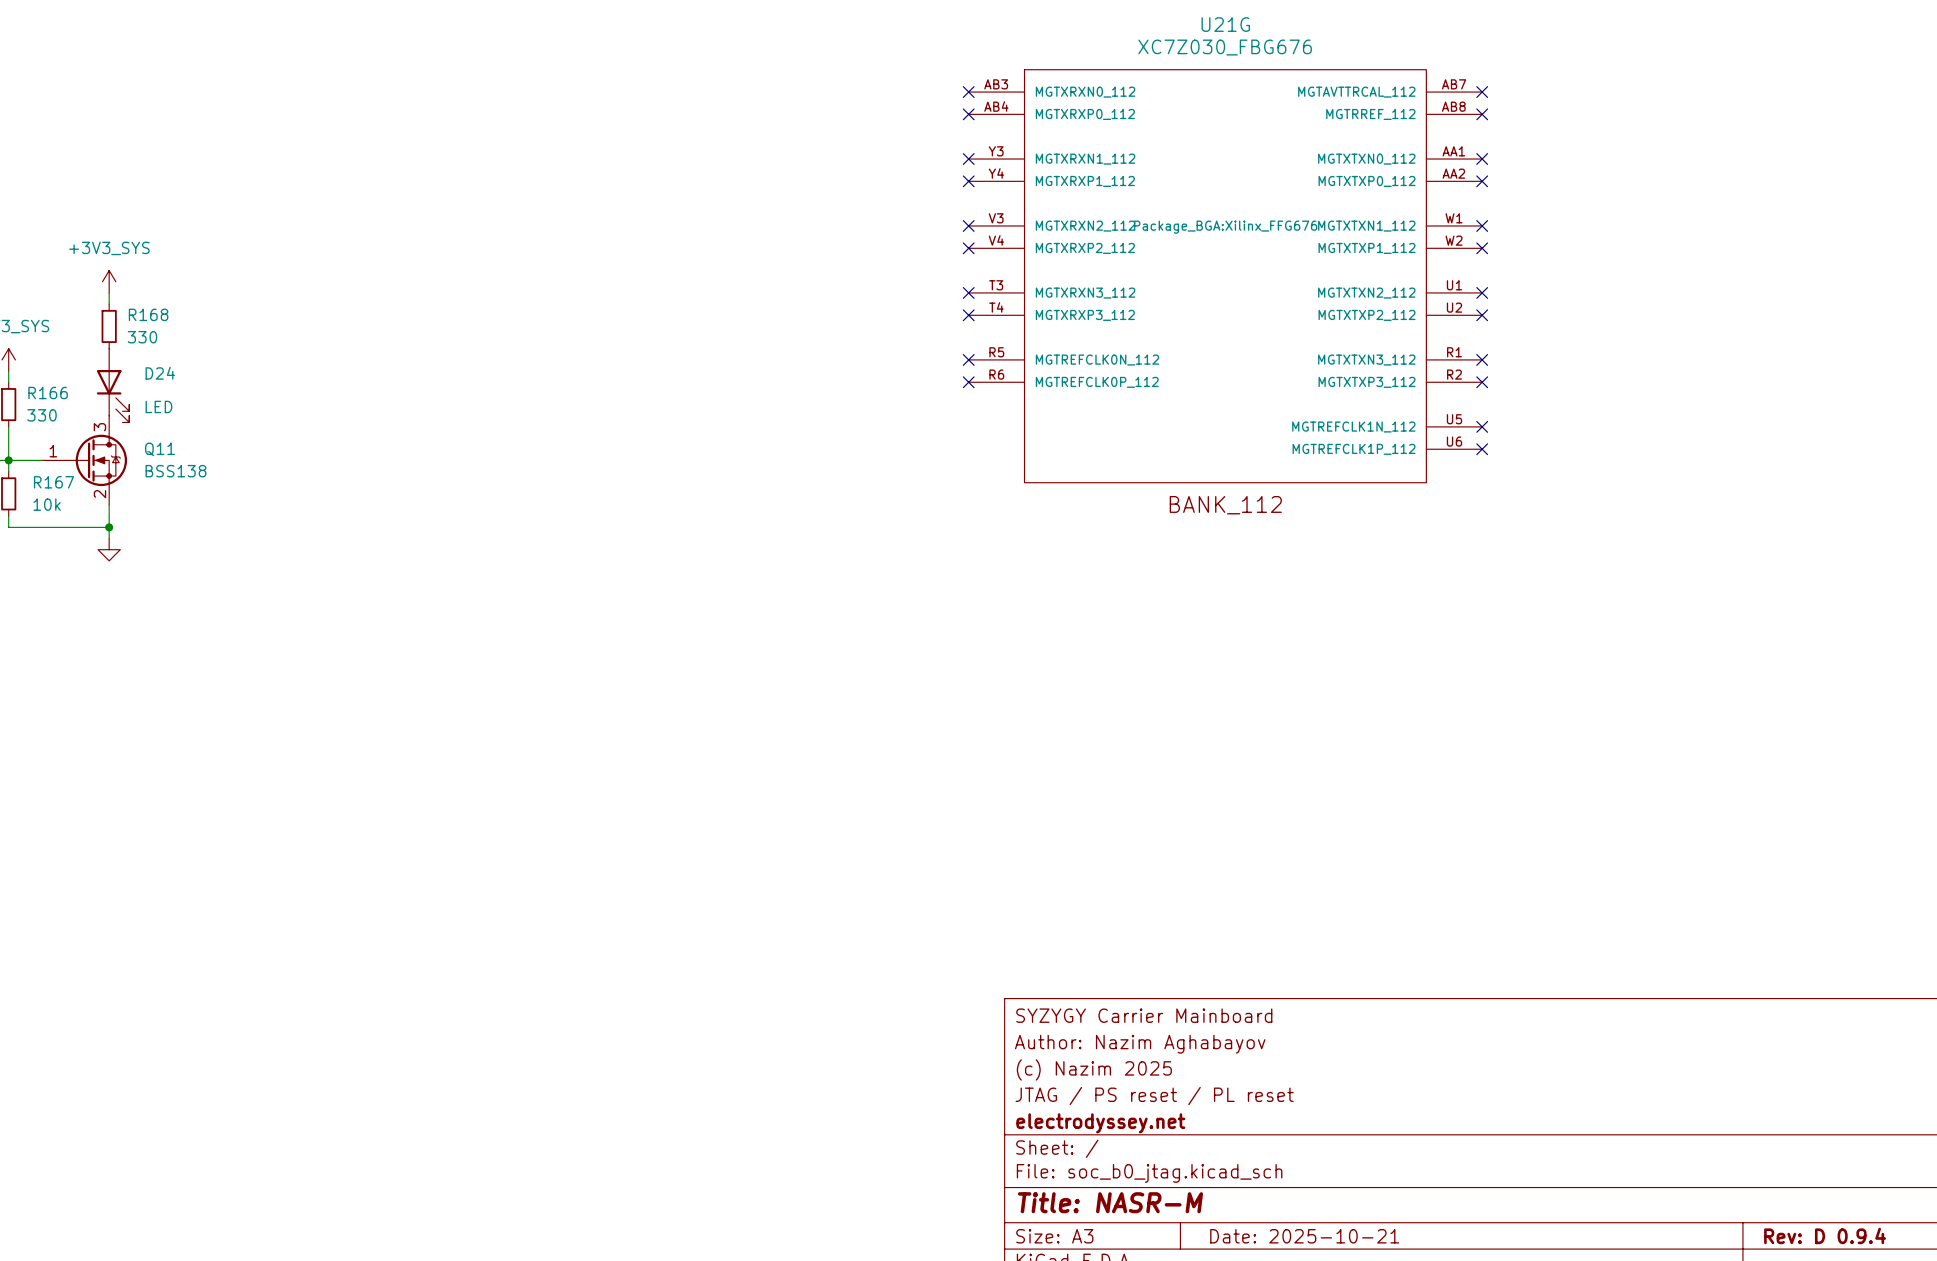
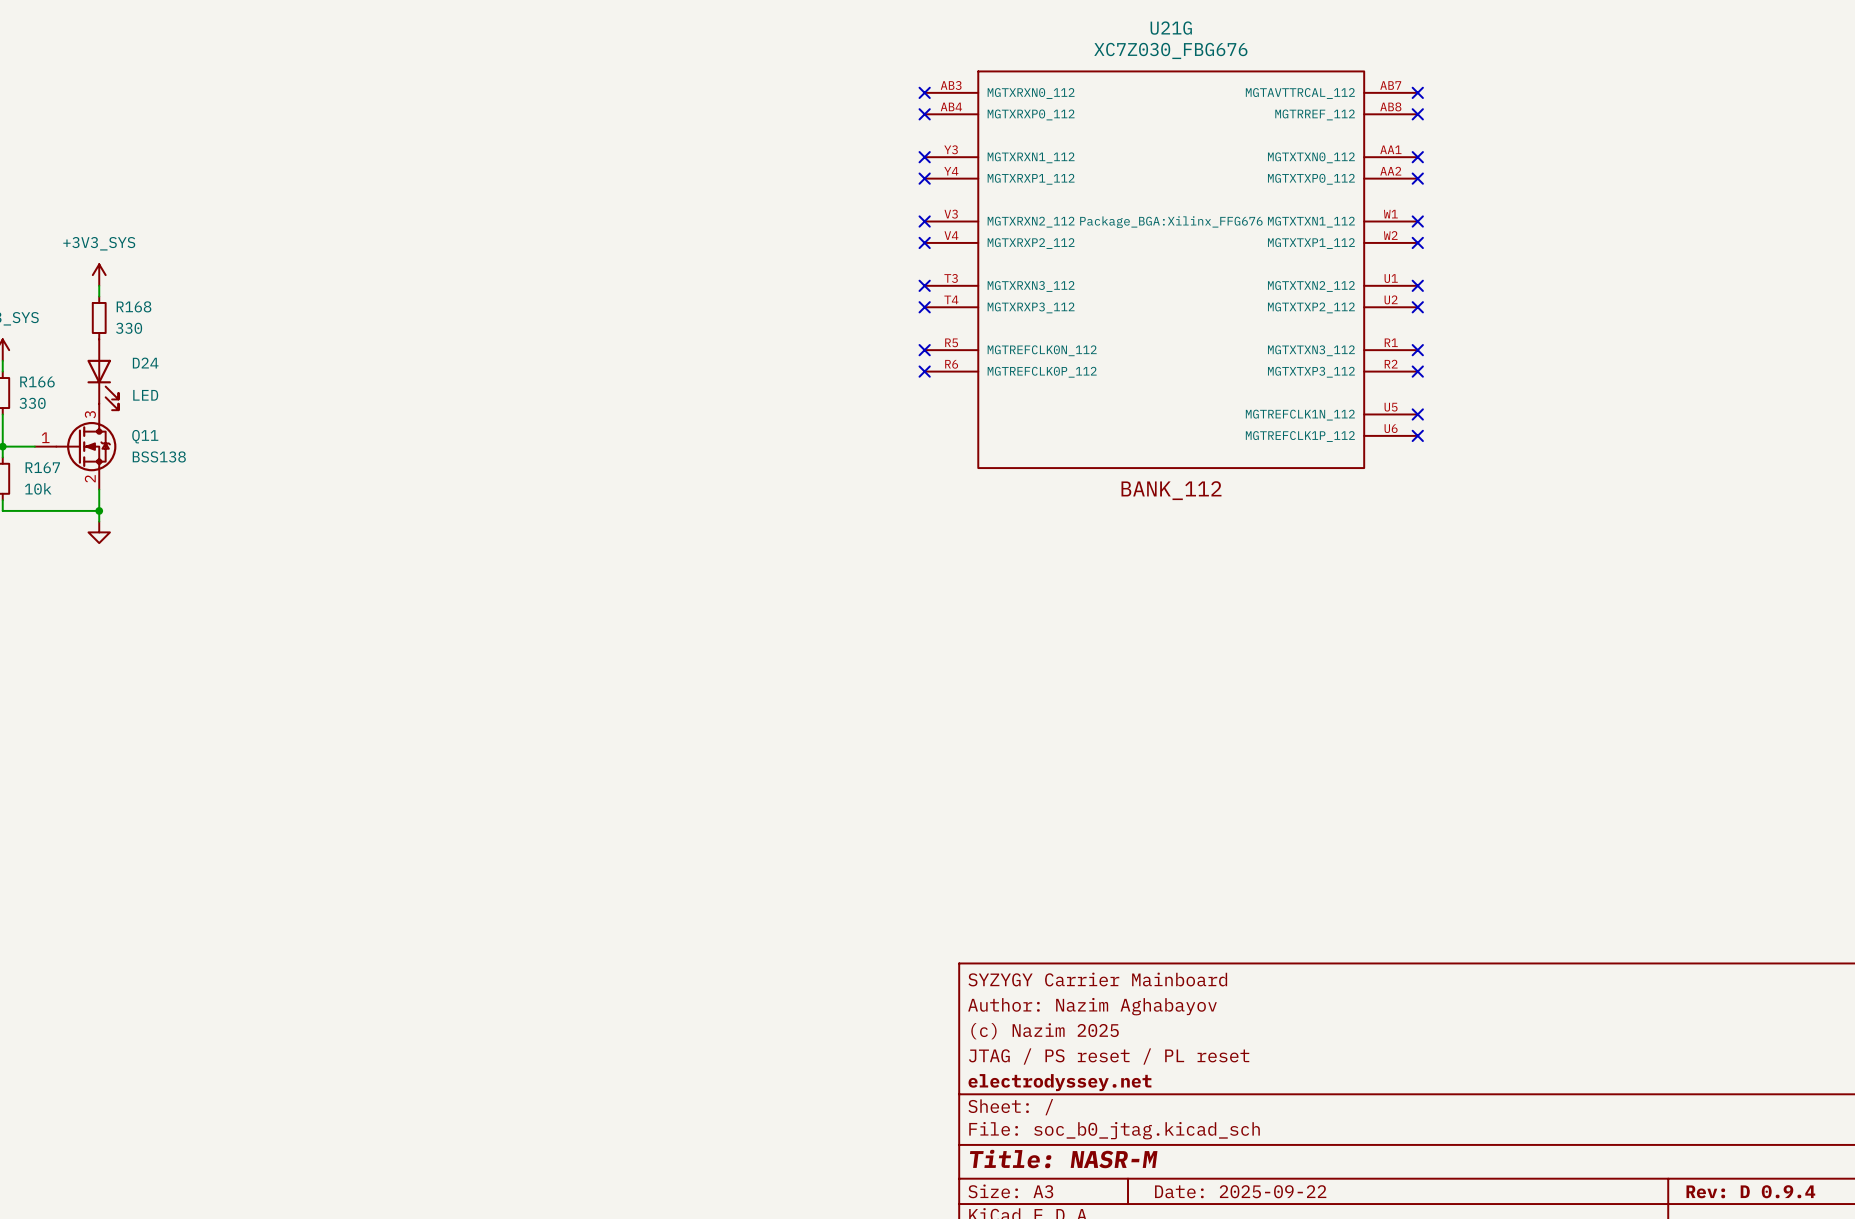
title block: Date: 2025-10-21 (1304, 1236) -> Date: 2025-09-22 (1240, 1191)

